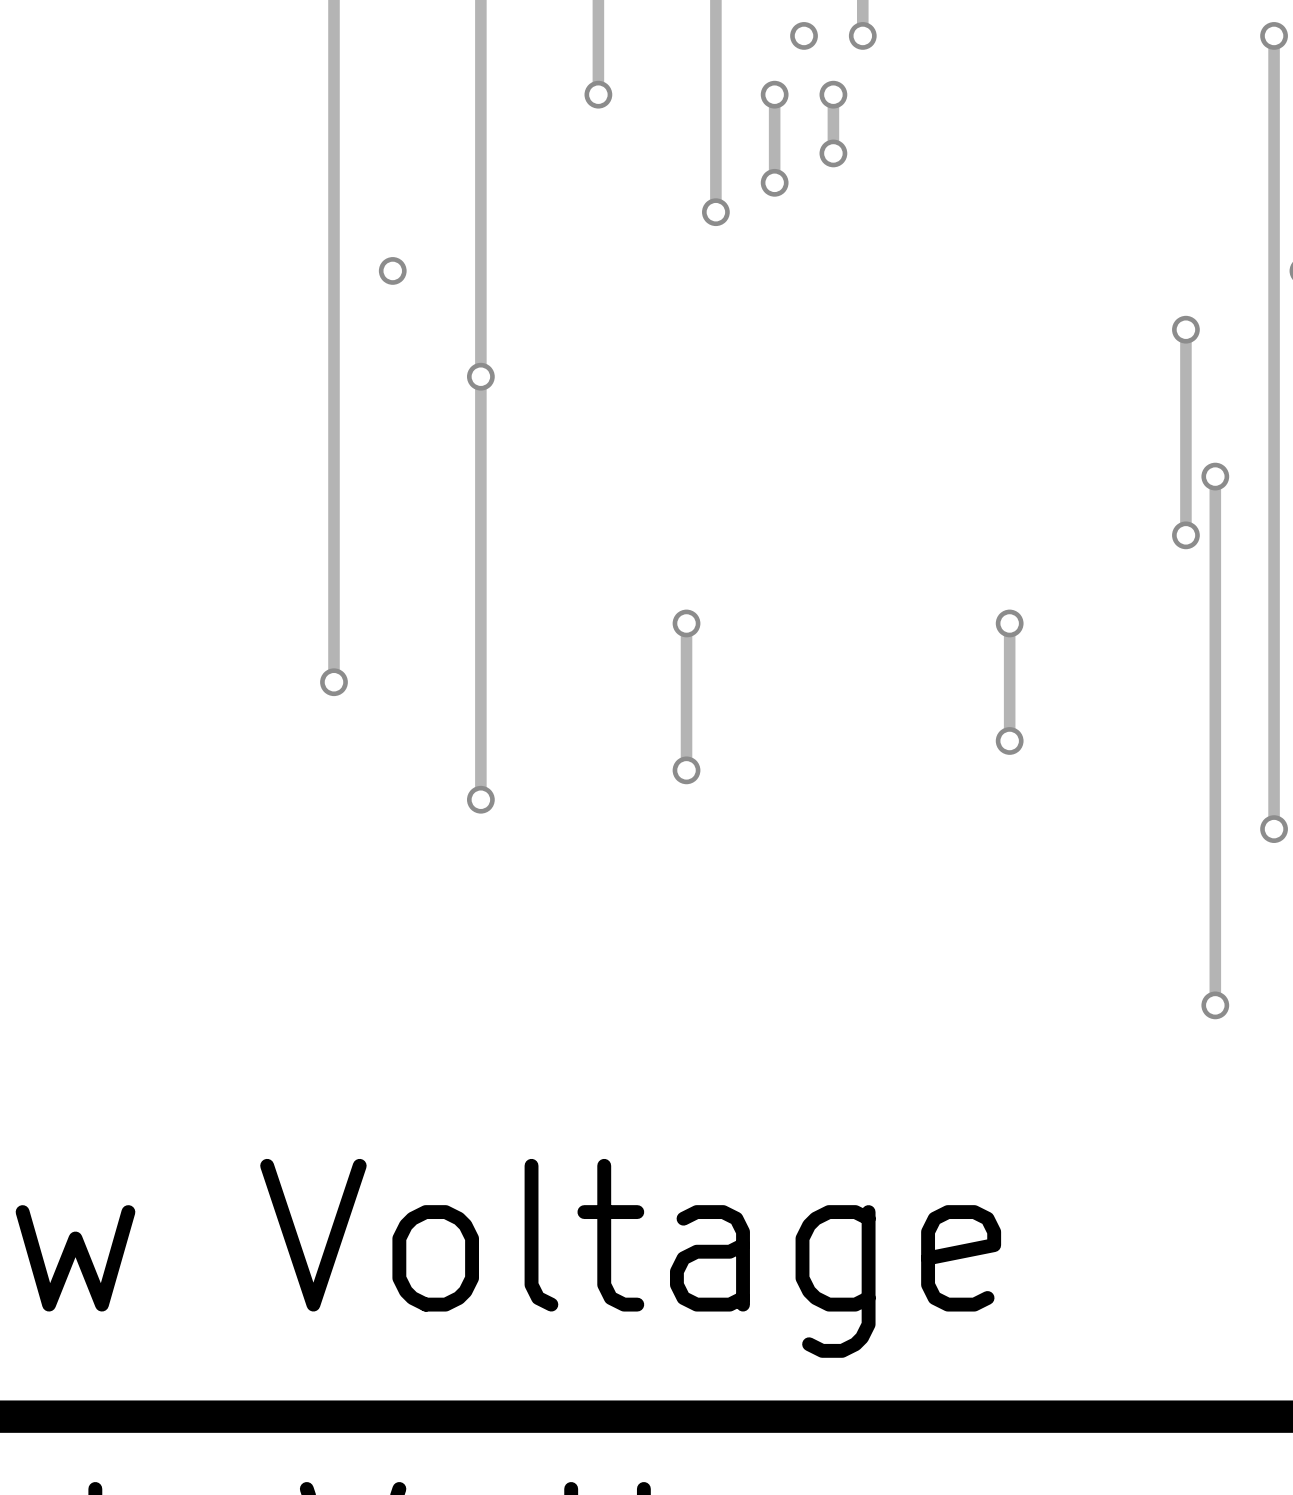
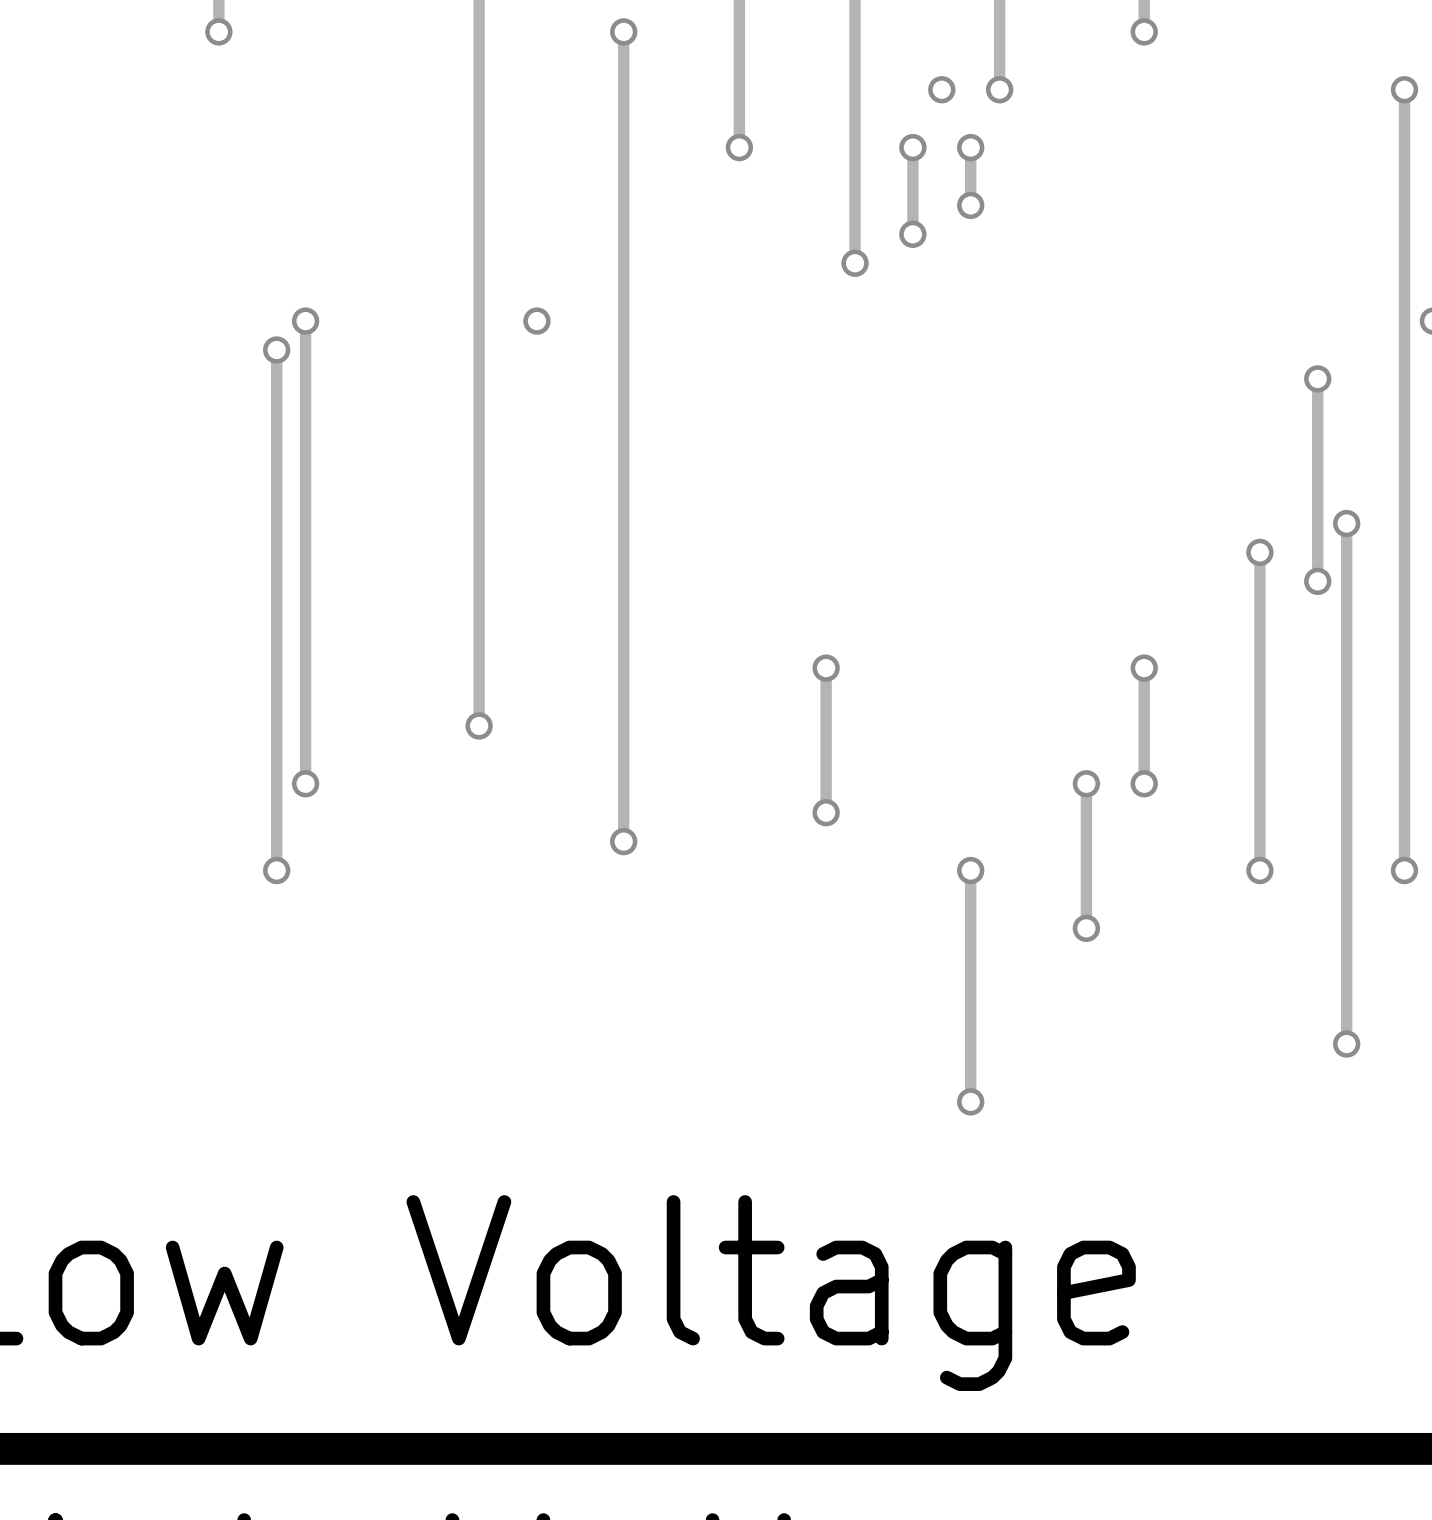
track: none -> (305, 321) (305, 783)
via: none -> (305, 321)
track: none -> (276, 350) (276, 870)
via: none -> (276, 350)
via: (480, 376) -> none
track: none -> (1259, 552) (1259, 870)
via: none -> (1259, 552)
via: none -> (305, 783)
track: none -> (1086, 783) (1086, 928)
via: none -> (1086, 783)
via: none -> (276, 870)
track: none -> (970, 870) (970, 1101)
via: none -> (970, 870)
via: none -> (1259, 870)
via: none -> (1086, 928)
via: none -> (970, 1101)

